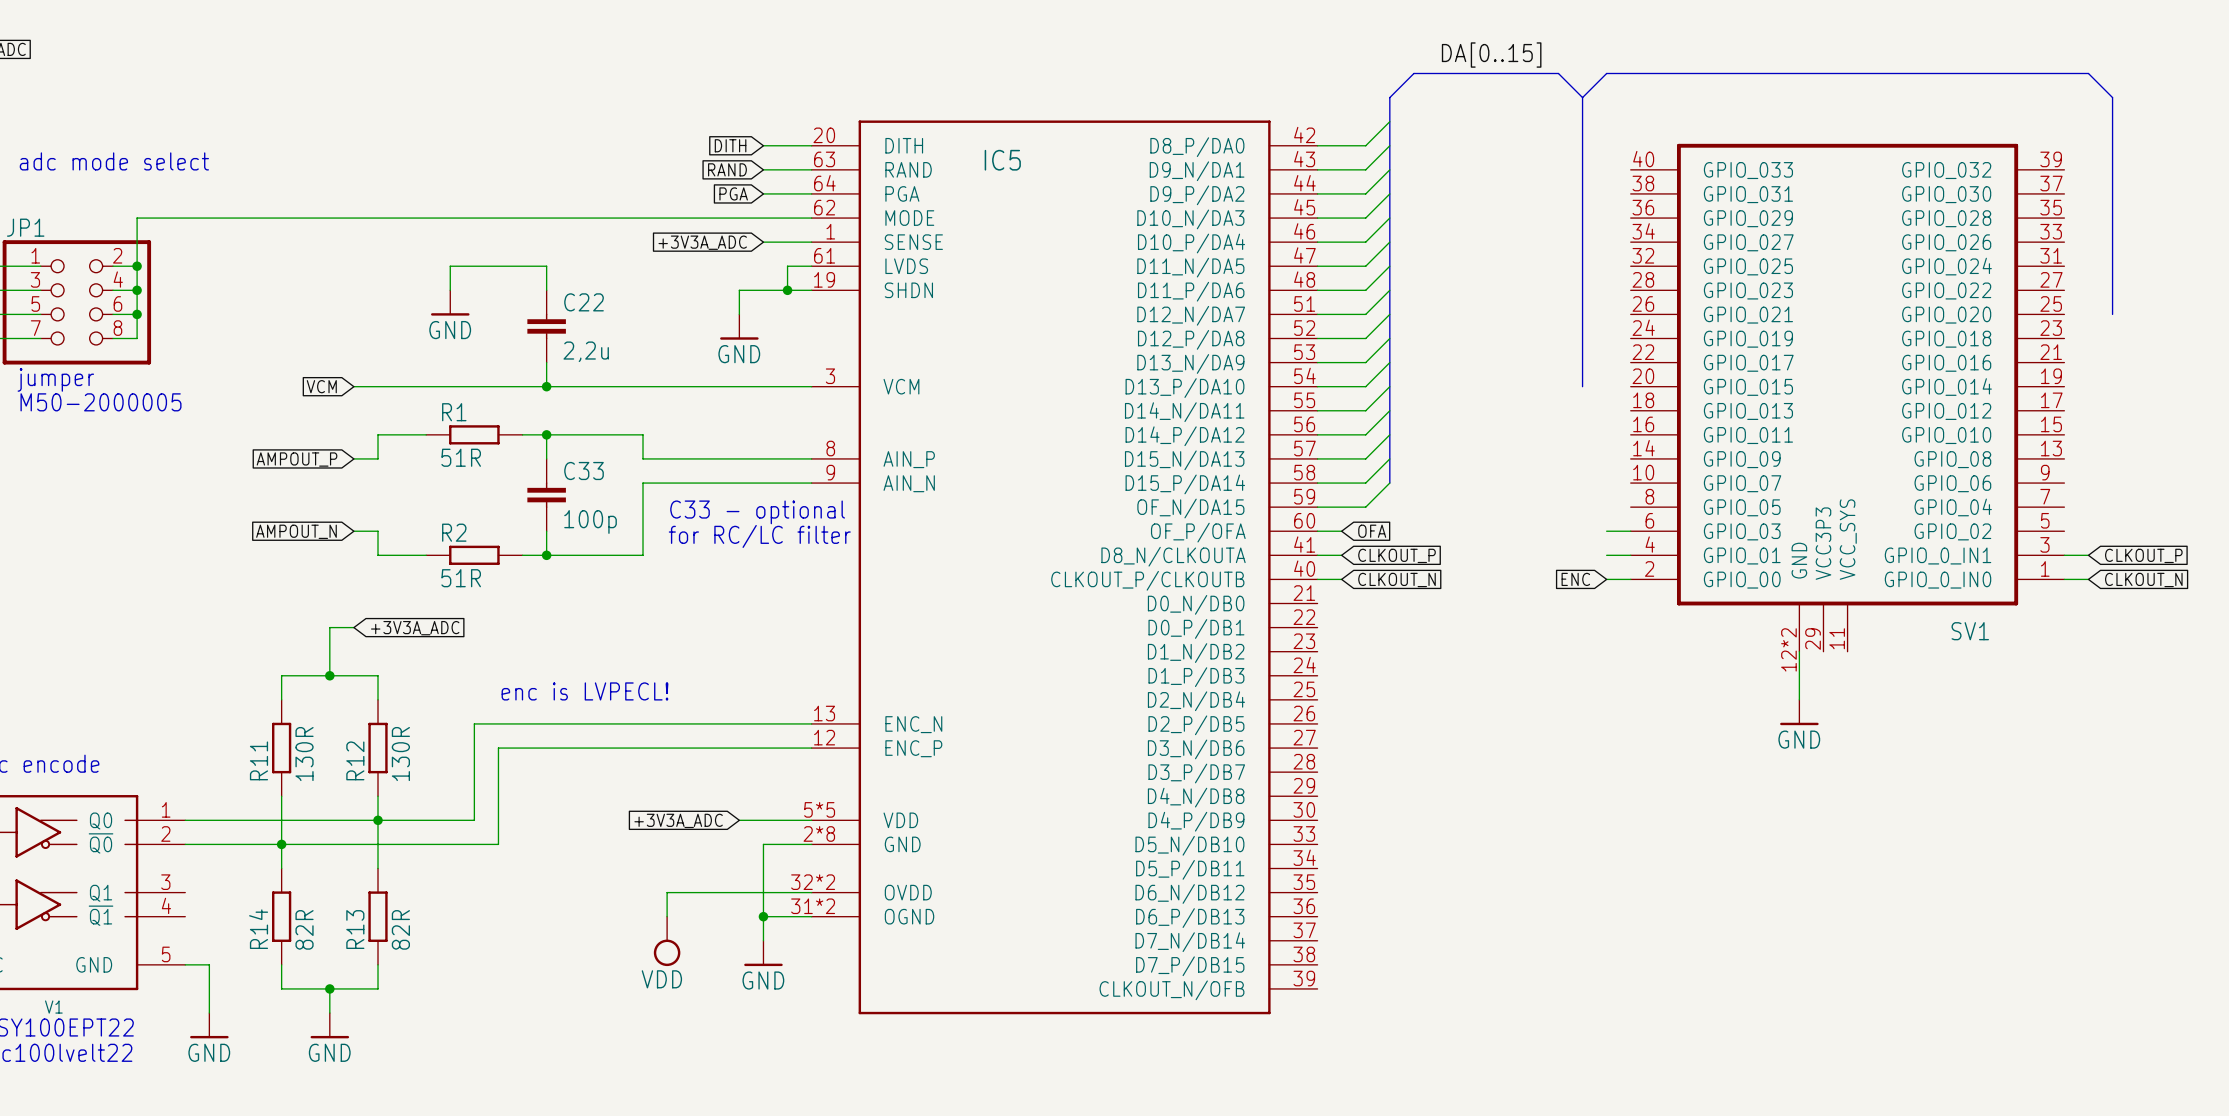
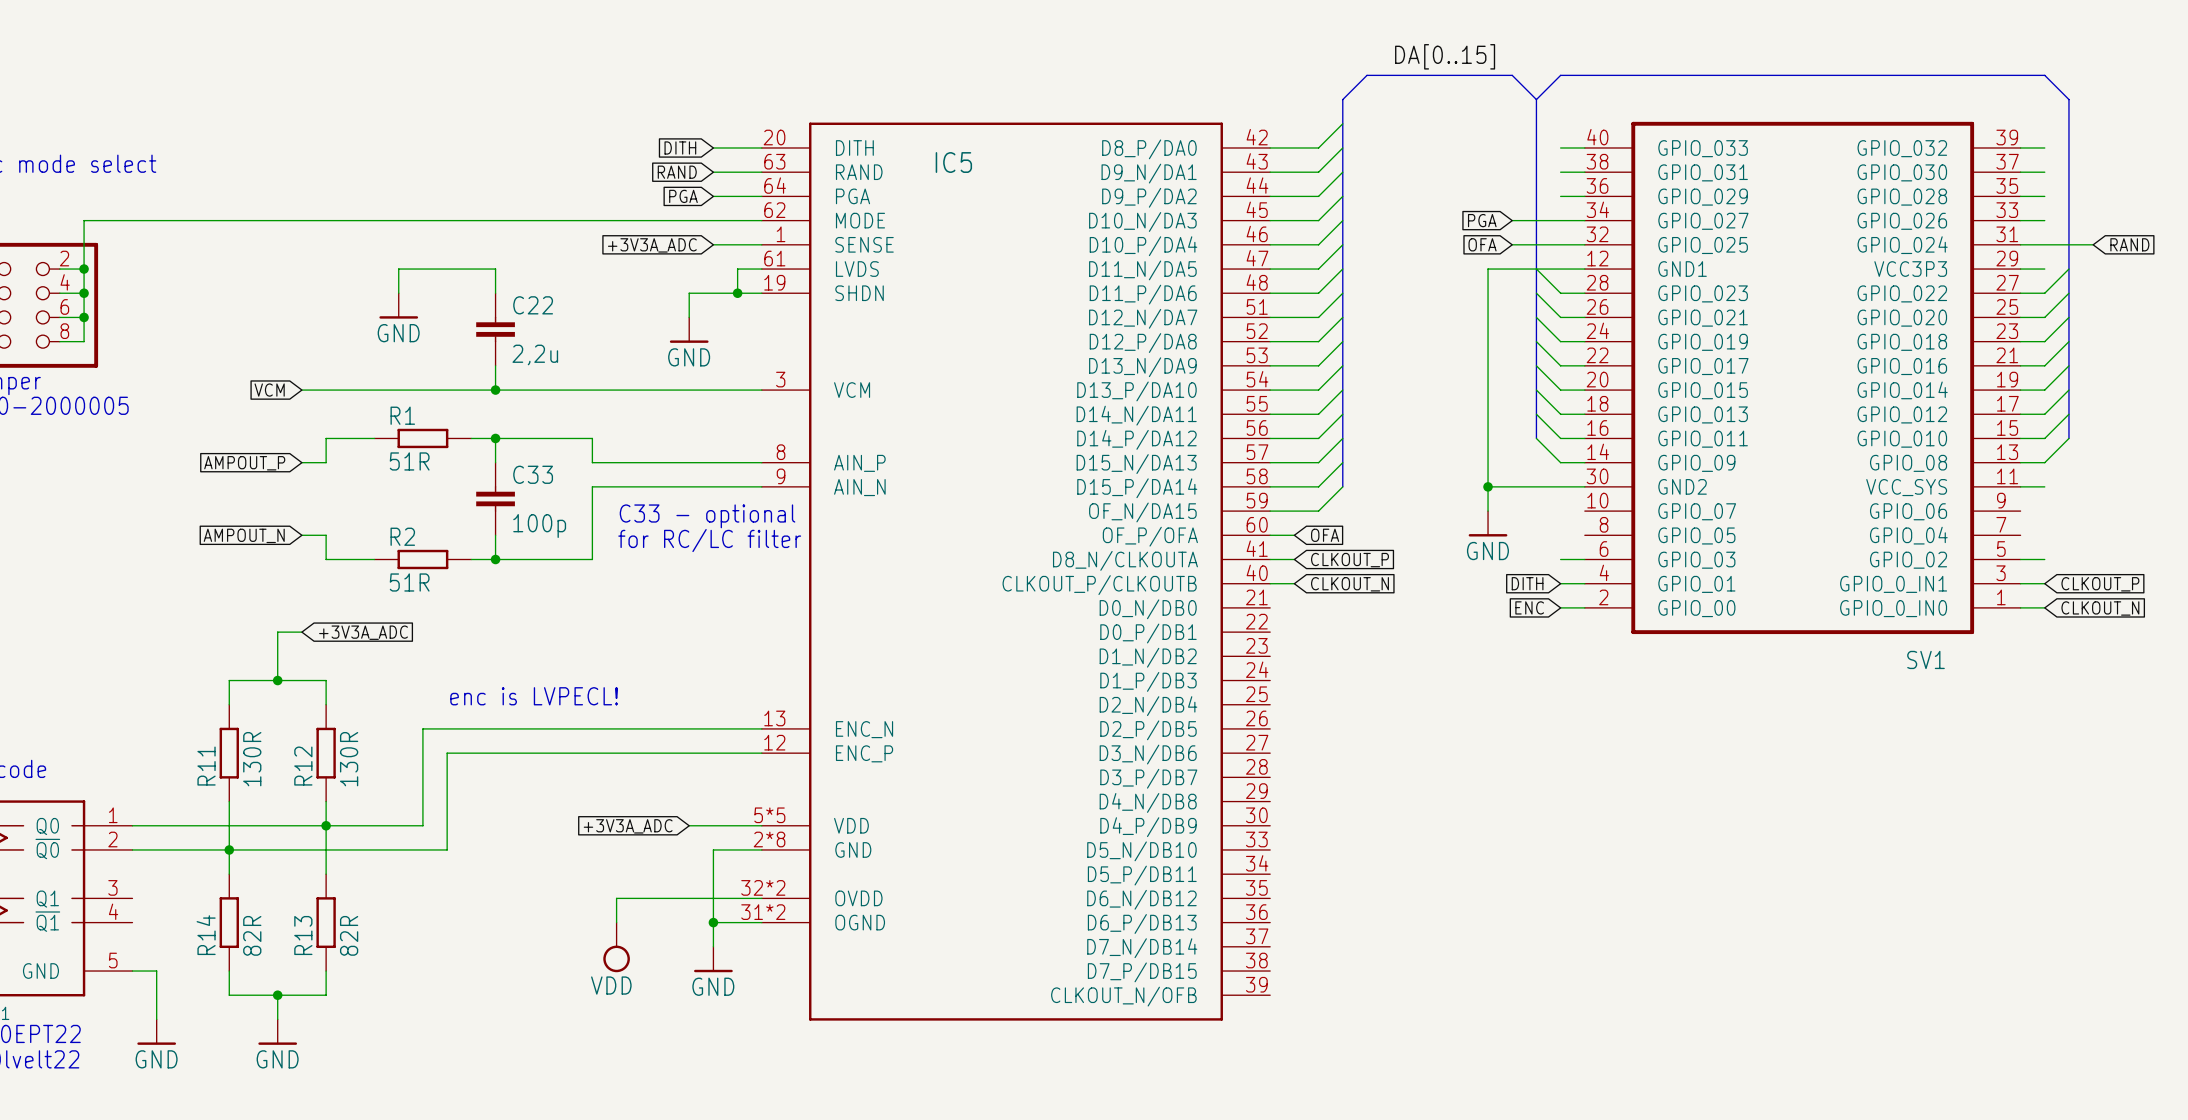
SV1 symbol: [1630, 143, 2065, 652] -> [1584, 121, 2021, 635]
wire: none -> (1560, 147) (1584, 147)
wire: none -> (2020, 147) (2044, 147)
wire: none -> (1560, 172) (1584, 172)
wire: none -> (2020, 172) (2044, 172)
wire: none -> (1560, 196) (1584, 196)
wire: none -> (2020, 196) (2044, 196)
global label: none -> PGA (1482, 220)
wire: none -> (1512, 220) (1584, 220)
wire: none -> (2020, 220) (2044, 220)
global label: none -> OFA (1482, 244)
wire: none -> (1512, 244) (1584, 244)
wire: none -> (2020, 244) (2093, 244)
global label: none -> RAND (2129, 244)
wire: none -> (1536, 269) (1560, 293) (1584, 293)
wire: none -> (1584, 269) (1488, 269) (1488, 511)
wire: none -> (2020, 269) (2044, 269)
wire: none -> (2068, 269) (2044, 293) (2020, 293)
wire: none -> (1536, 293) (1560, 317) (1584, 317)
wire: none -> (2068, 293) (2044, 317) (2020, 317)
wire: none -> (1536, 317) (1560, 341) (1584, 341)
bus: none -> (2068, 317) (2068, 438)
wire: none -> (2068, 317) (2044, 341) (2020, 341)
wire: none -> (1536, 341) (1560, 365) (1584, 365)
wire: none -> (2068, 341) (2044, 365) (2020, 365)
wire: none -> (1536, 365) (1560, 390) (1584, 390)
wire: none -> (2068, 365) (2044, 390) (2020, 390)
bus: none -> (1536, 390) (1536, 438)
wire: none -> (1536, 390) (1560, 414) (1584, 414)
wire: none -> (2068, 390) (2044, 414) (2020, 414)
wire: none -> (1536, 414) (1560, 438) (1584, 438)
wire: none -> (2068, 414) (2044, 438) (2020, 438)
wire: none -> (1536, 438) (1560, 462) (1584, 462)
wire: none -> (2068, 438) (2044, 462) (2020, 462)
wire: none -> (1488, 486) (1584, 486)
junction: none -> (1488, 486)
wire: none -> (2020, 486) (2044, 486)
power symbol: none -> GND (1488, 523)
wire: (1606, 531) (1630, 531) -> (1560, 607) (1584, 607)
global label: CLKOUT_P (2143, 555) -> none
global label: ENC (1575, 579) -> DITH (1527, 583)
global label: CLKOUT_N (2143, 579) -> CLKOUT_P (2100, 584)
global label: none -> ENC (1529, 607)
wire: none -> (2020, 607) (2044, 607)
global label: none -> CLKOUT_N (2100, 608)
SV1 name position: SV1 (1970, 631) -> SV1 (1925, 659)
wire: (1799, 651) (1799, 699) -> none
power symbol: GND (1799, 712) -> none

